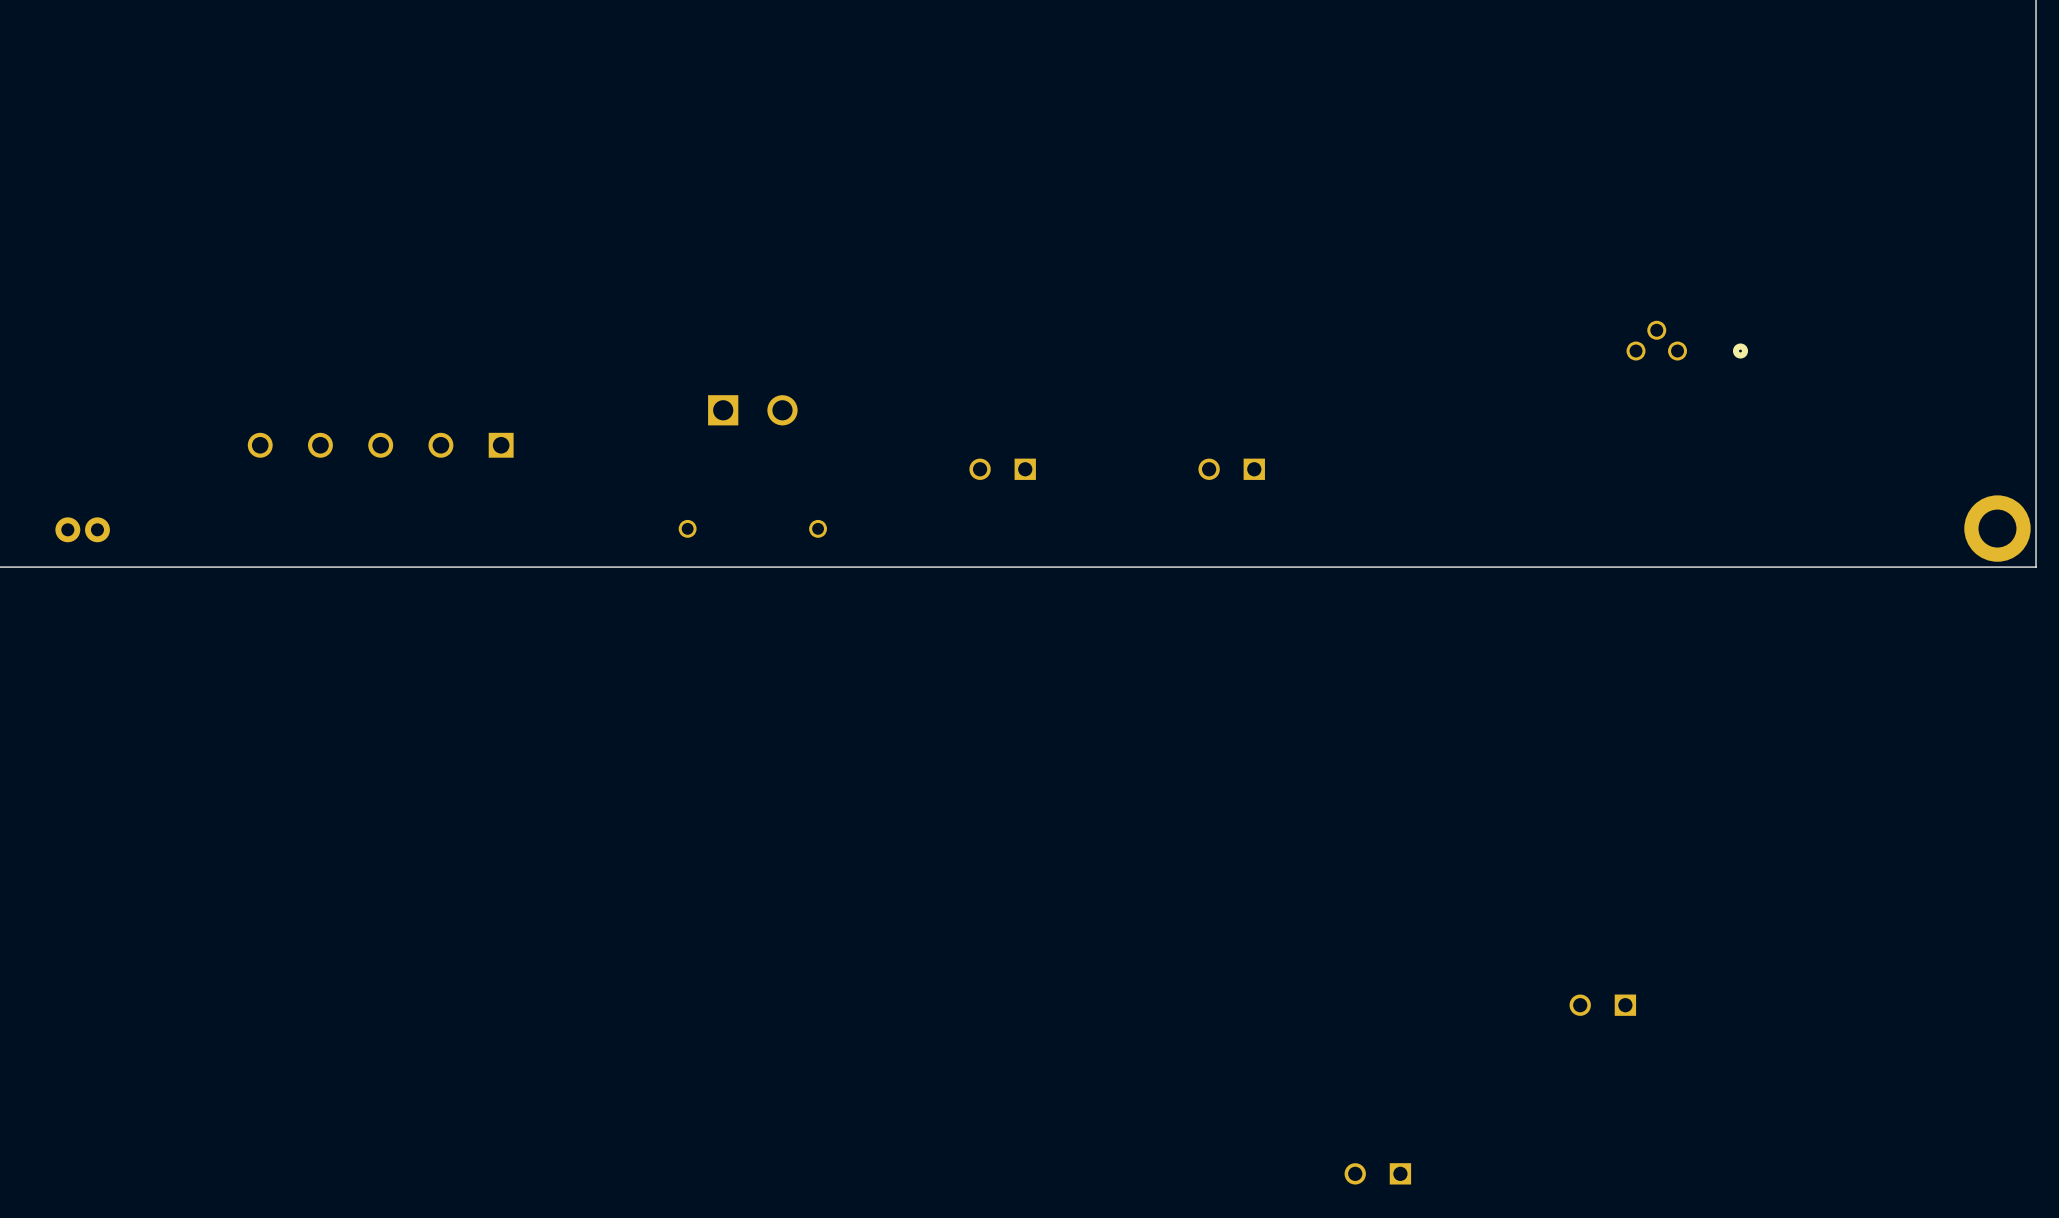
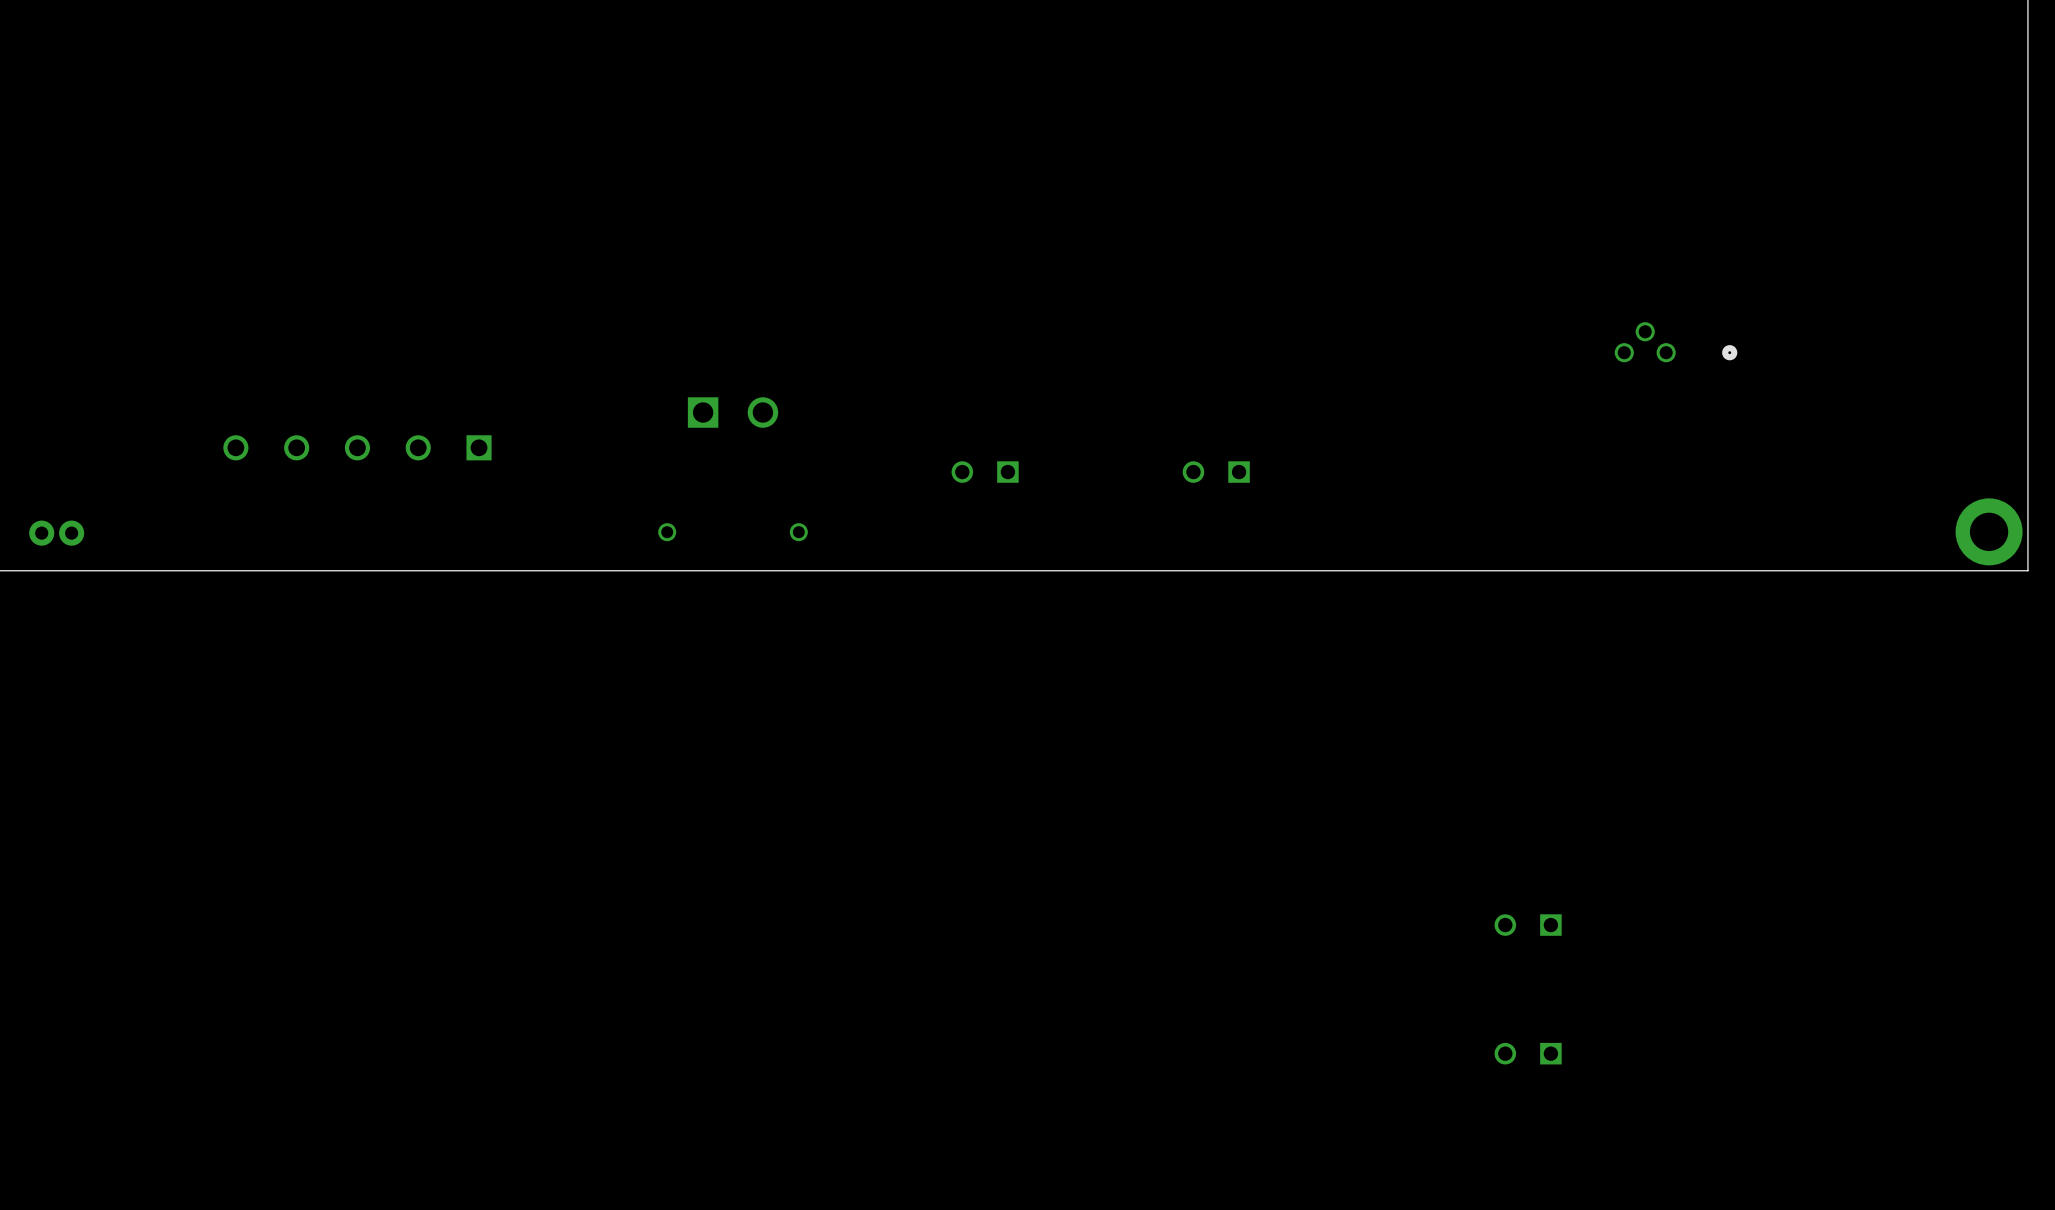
part: none -> (1528, 925)
part: (1602, 1005) -> none
part: none -> (1528, 1053)
part: (1377, 1173) -> none

